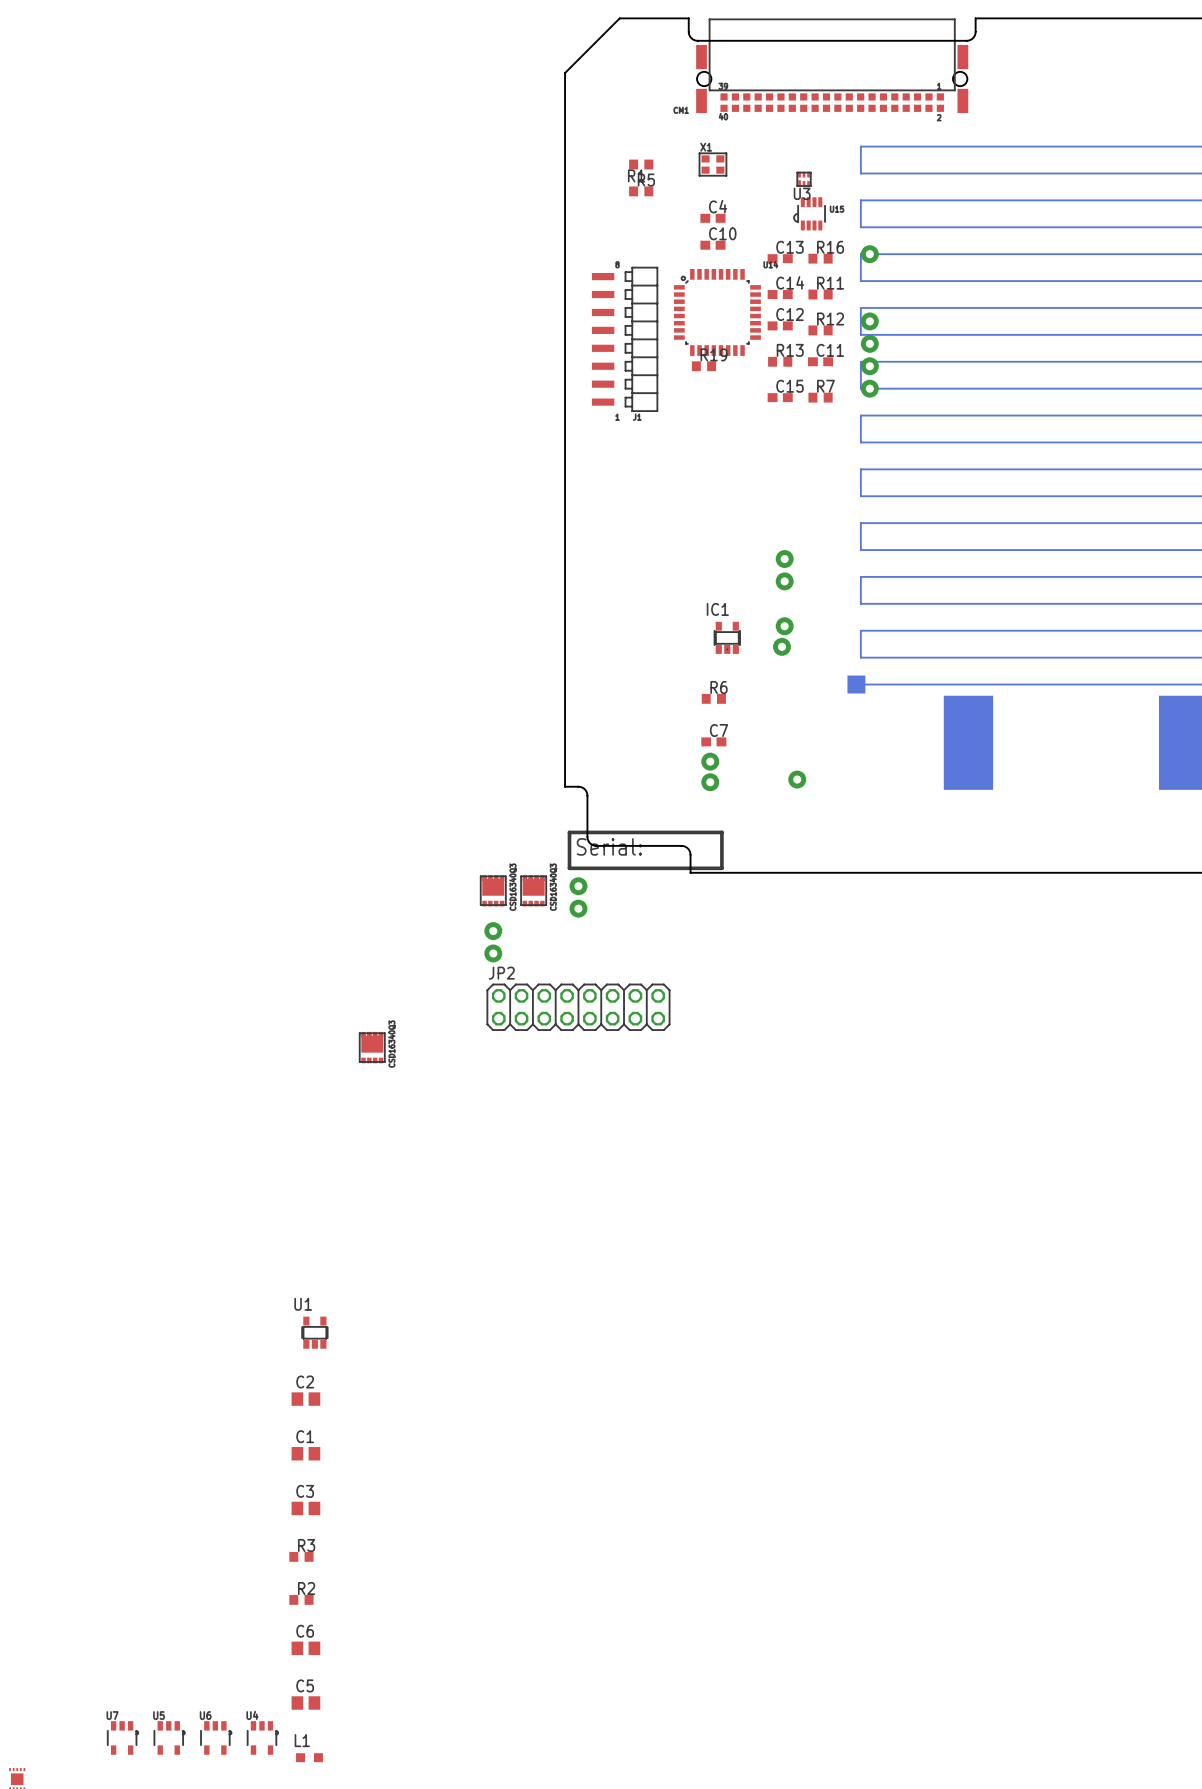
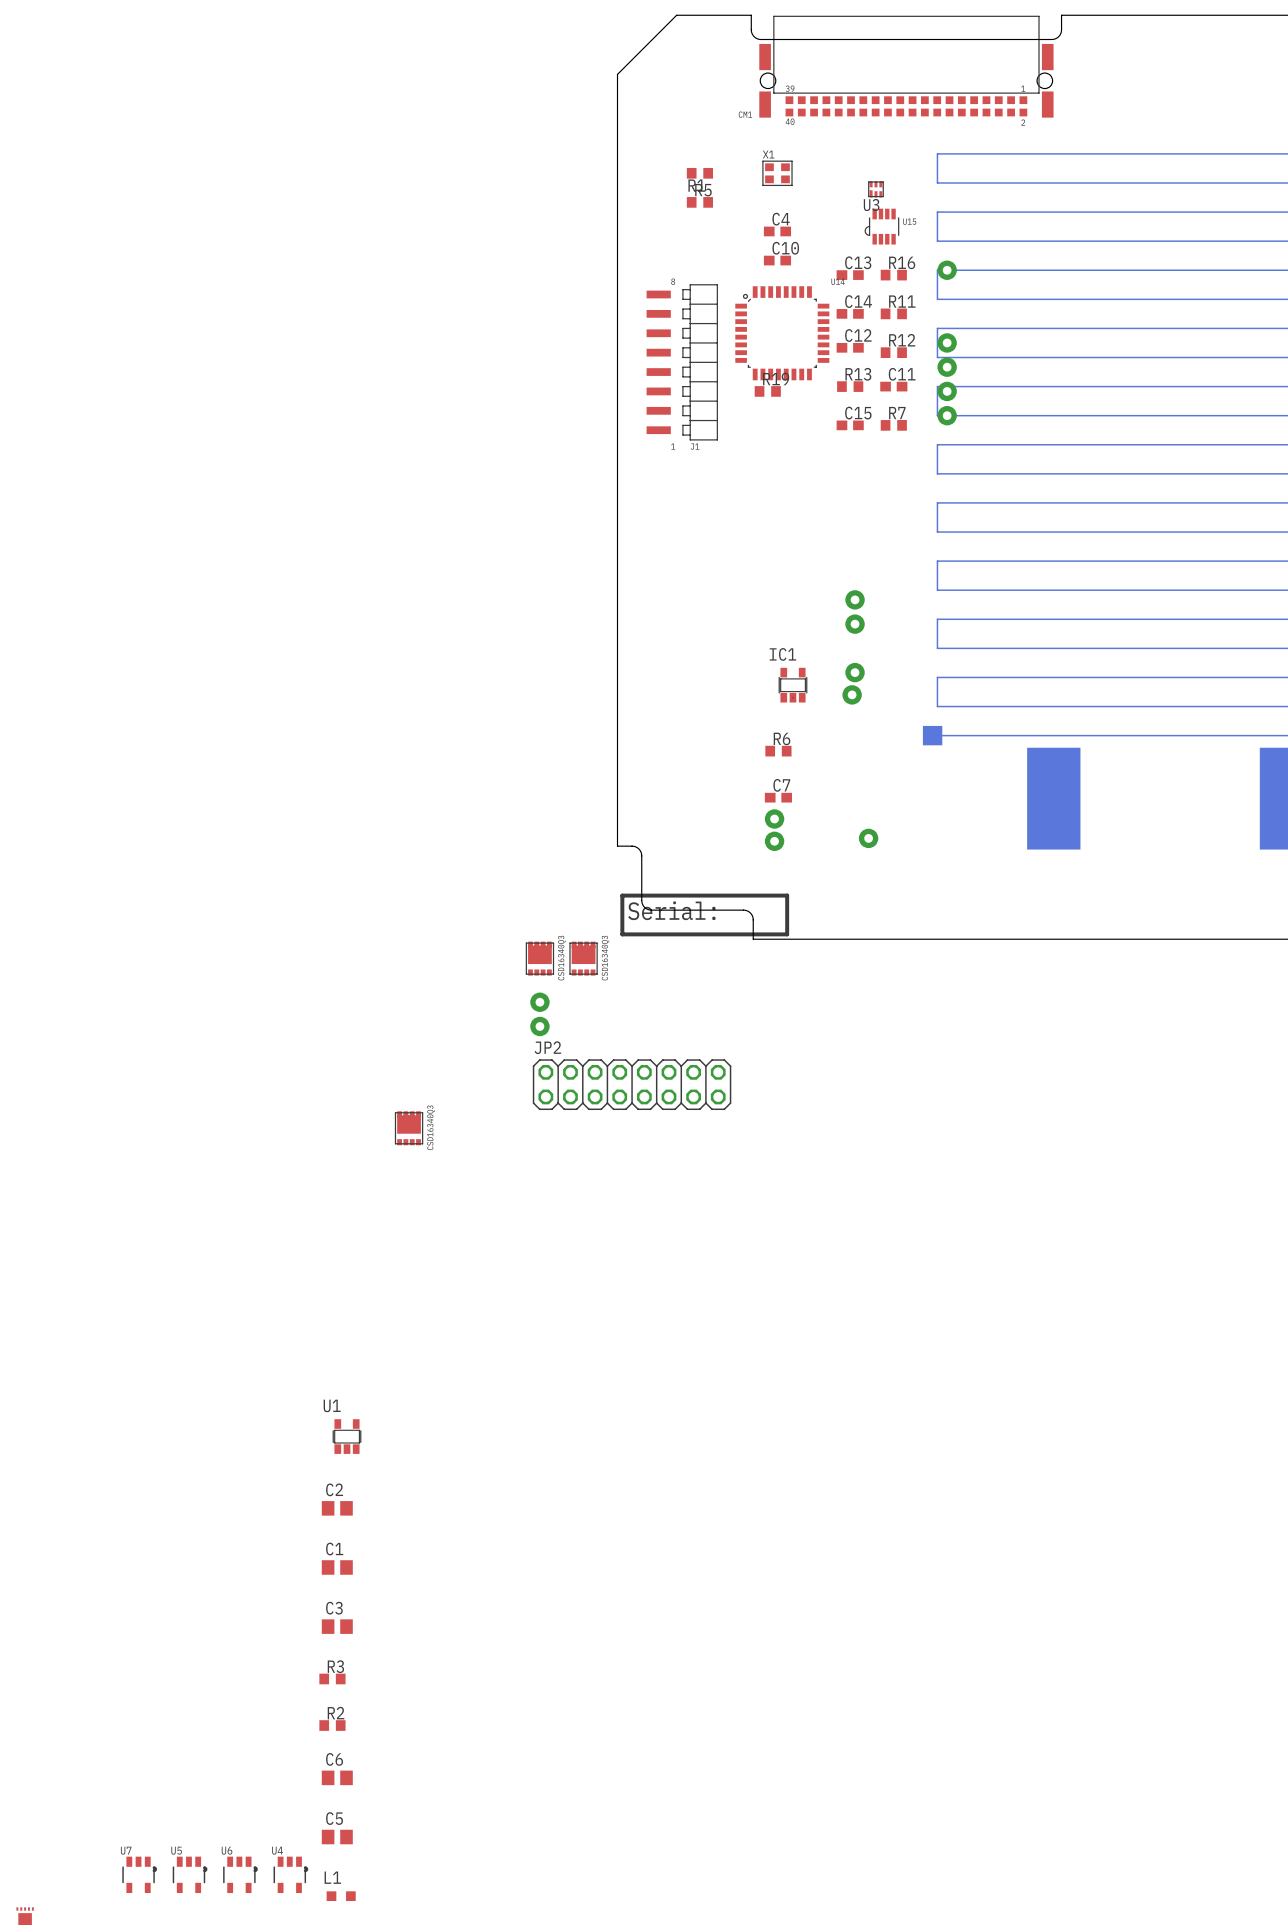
part: (578, 886) -> none
part: (578, 908) -> none

